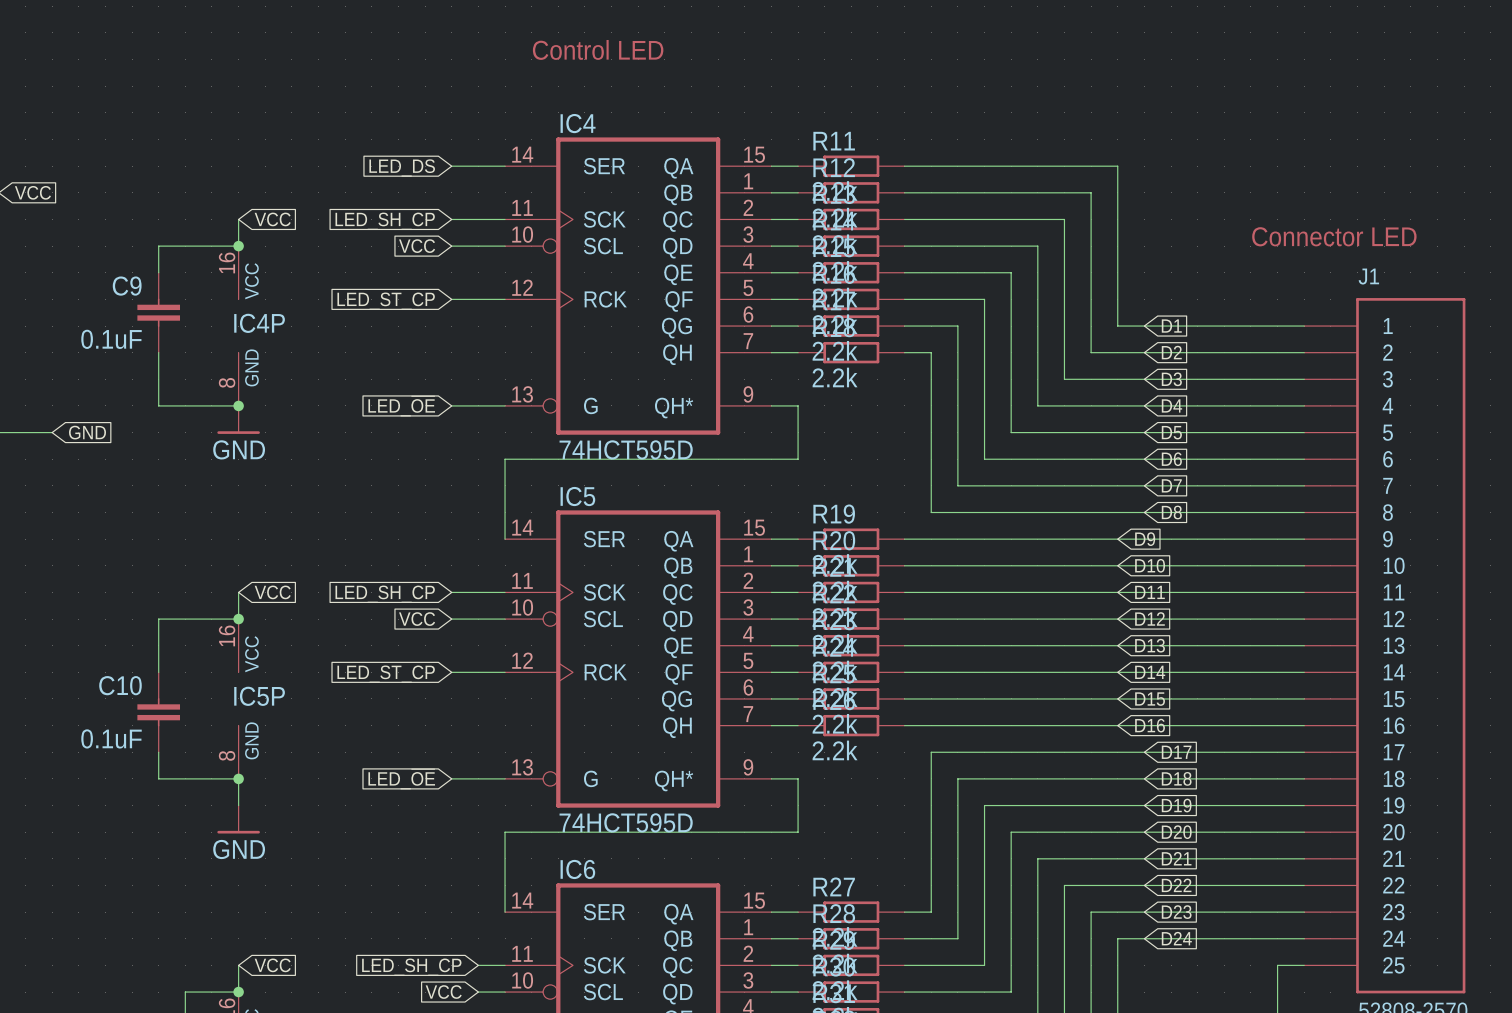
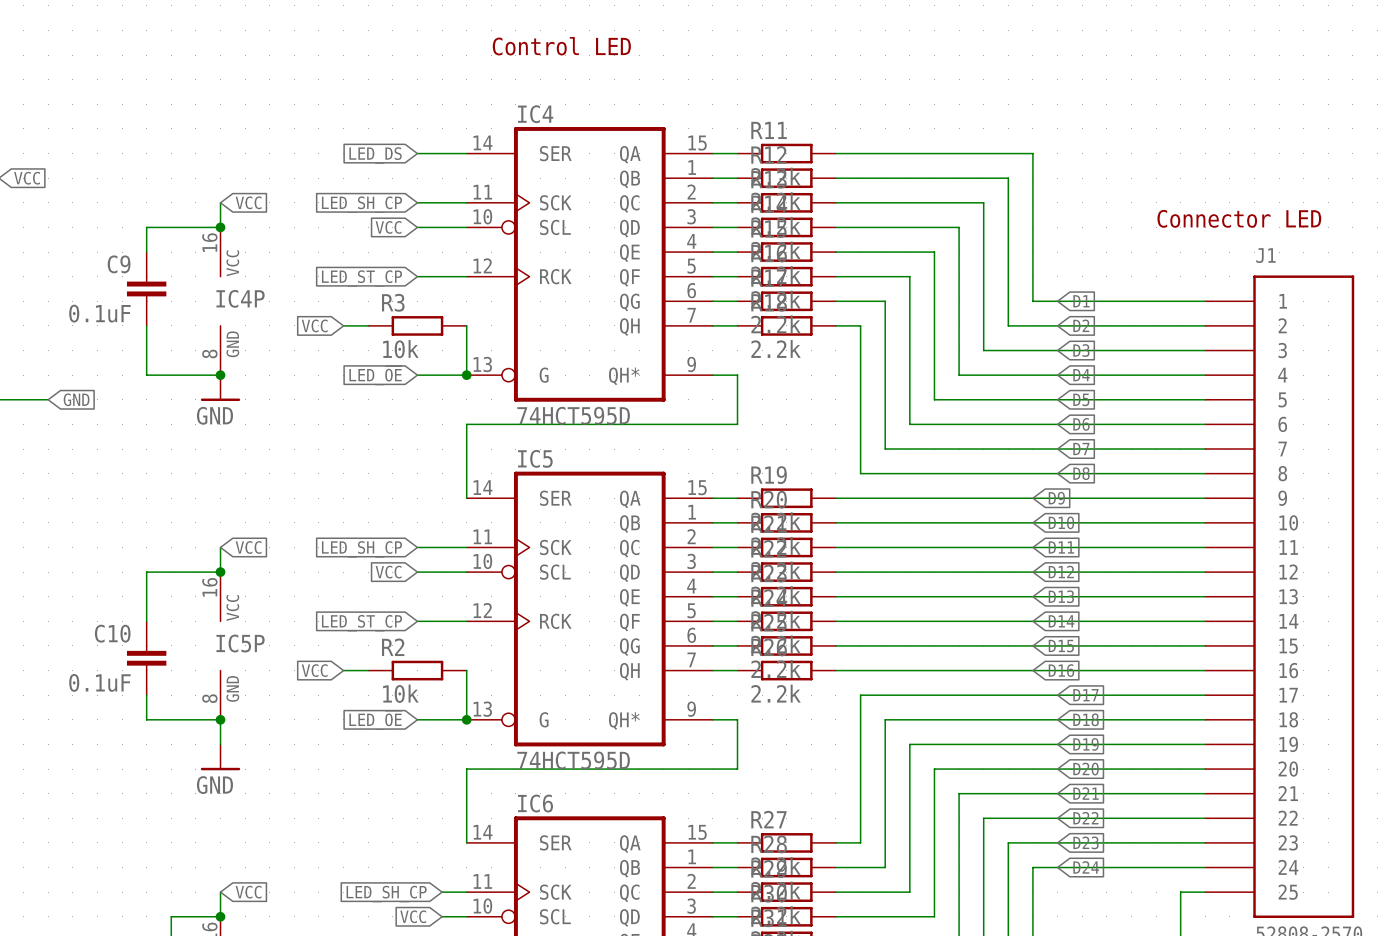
global label: none -> VCC (314, 325)
wire: none -> (343, 325) (368, 325)
R3: none -> 10k (417, 325)
wire: none -> (466, 325) (466, 375)
junction: none -> (466, 375)
global label: none -> VCC (314, 670)
wire: none -> (343, 670) (368, 670)
R2: none -> 10k (417, 670)
wire: none -> (466, 670) (466, 719)
junction: none -> (466, 719)

